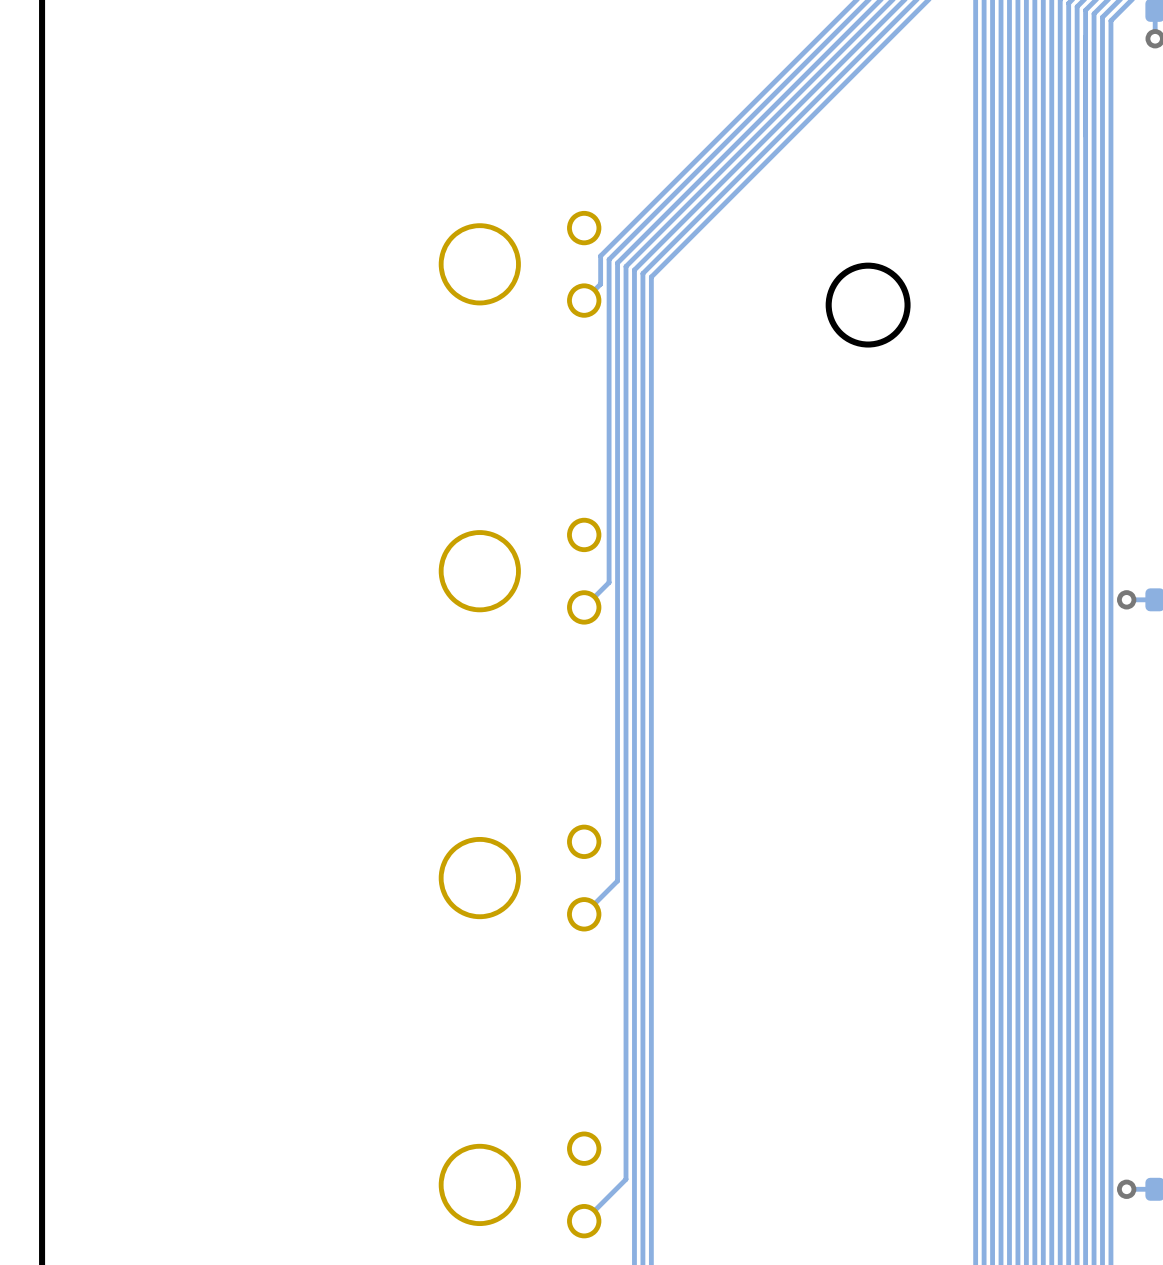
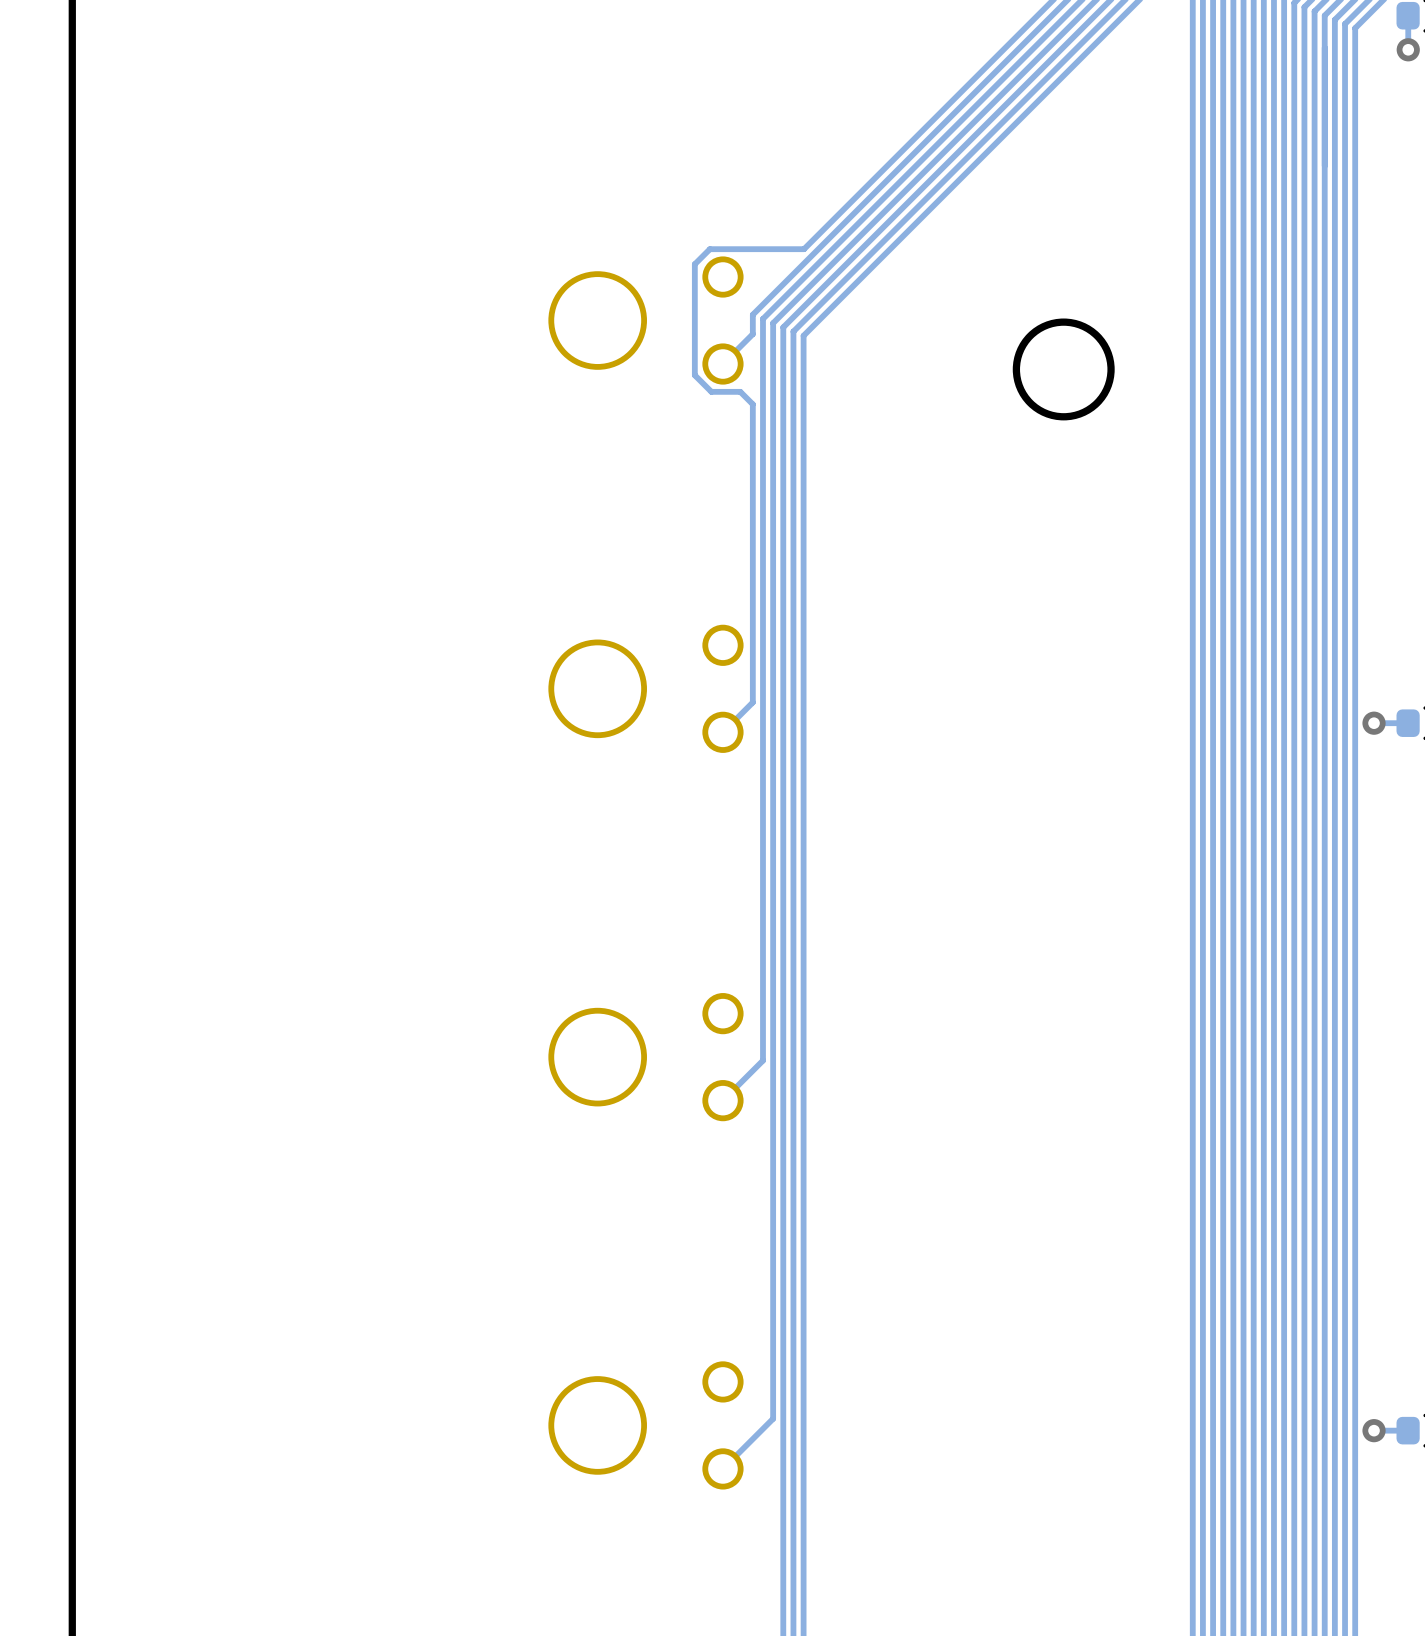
track: (651, 204) (600, 255) (600, 284) -> (804, 249) (709, 249) (694, 264) (694, 375) (711, 391) (740, 391) (752, 404)
track: (609, 275) (609, 334) -> (752, 334) (742, 344)

